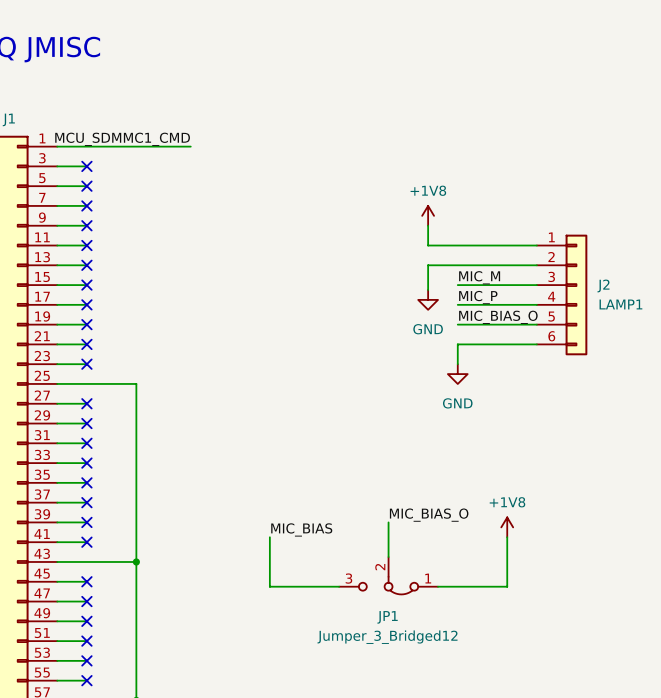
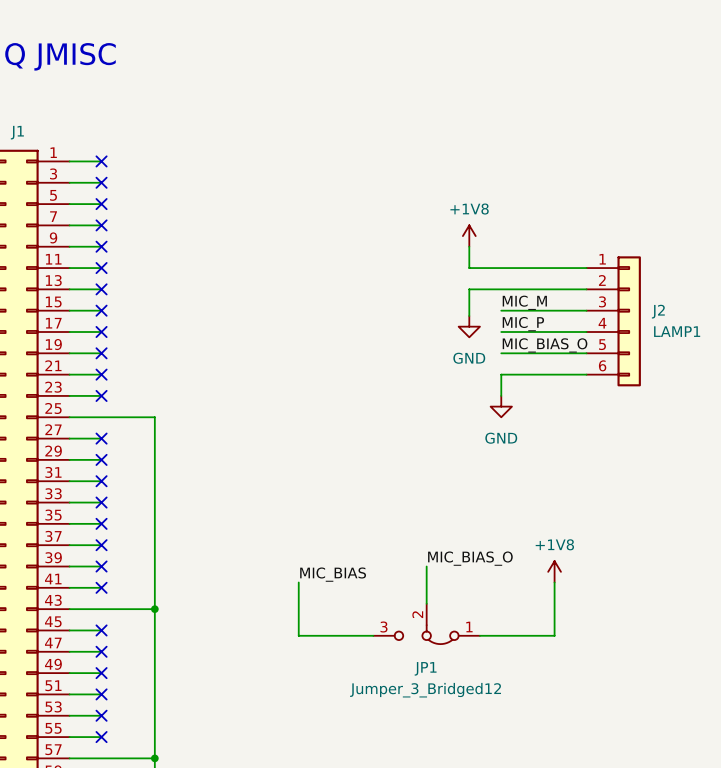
label: MCU_SDMMC1_CMD (122, 139) -> none
wire: (86, 146) (190, 146) -> none
no-connect mark: none -> (101, 161)

